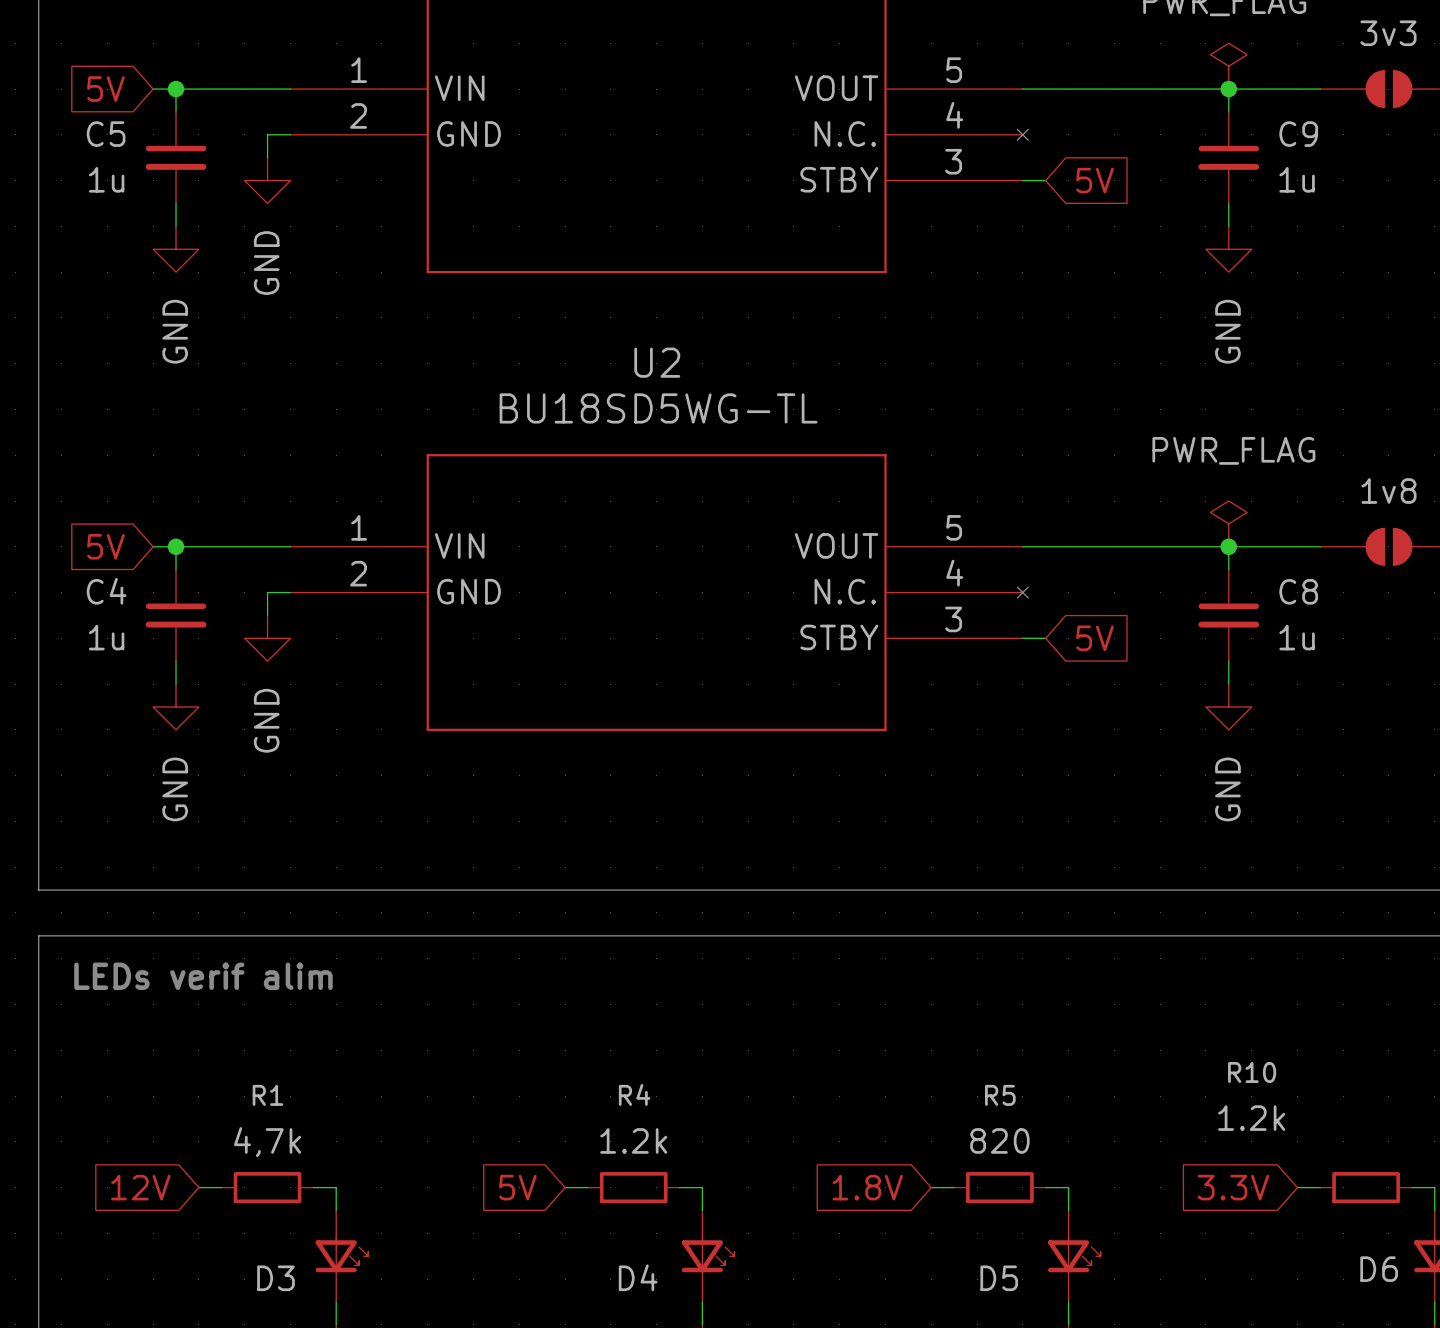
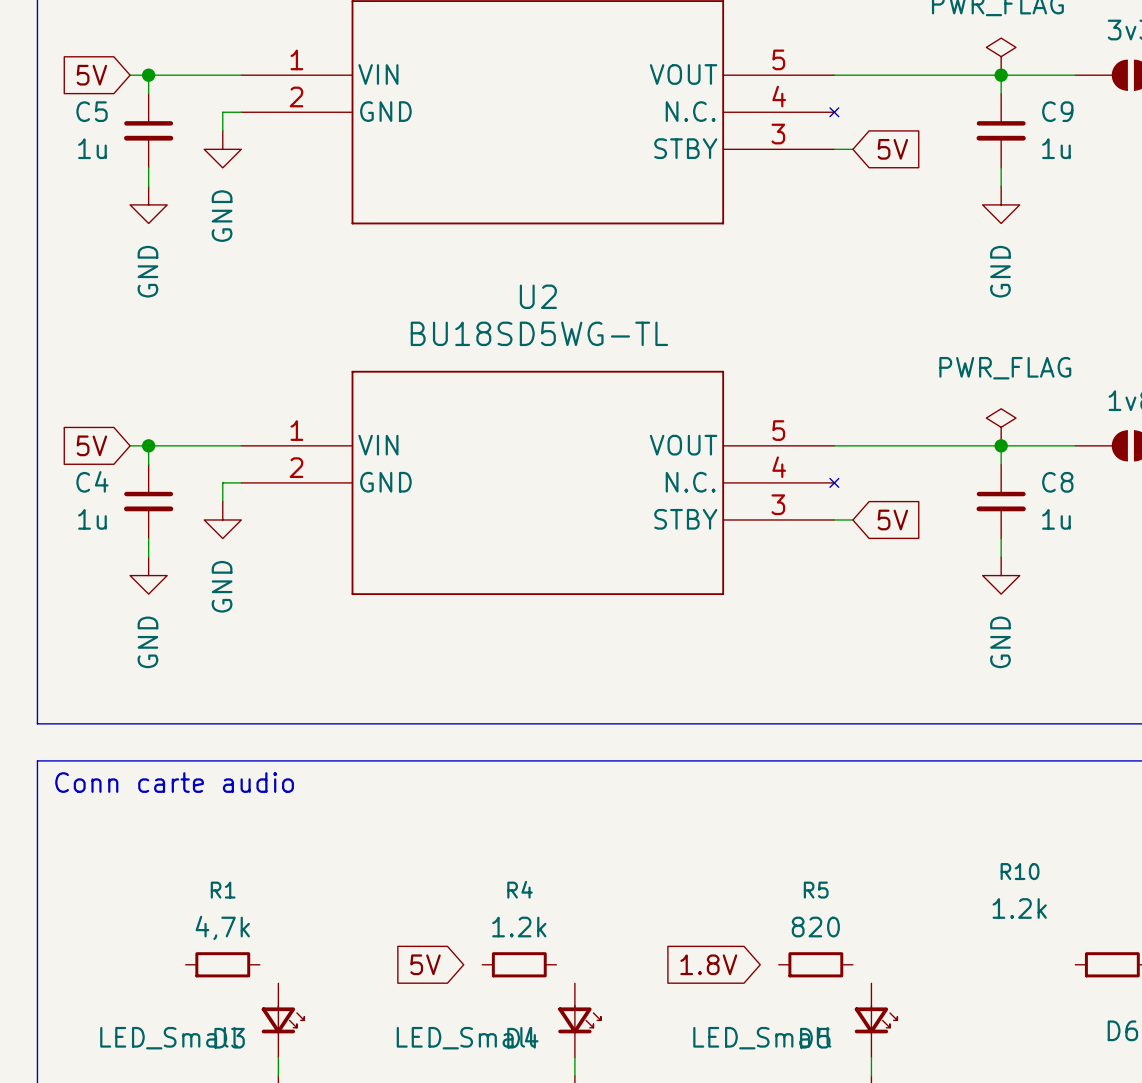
text: LEDs verif alim (203, 976) -> Conn carte audio (174, 782)
global label: 12V (140, 1187) -> none
wire: (198, 1187) (221, 1187) -> none
wire: (313, 1187) (336, 1187) (336, 1210) -> none
wire: (565, 1187) (587, 1187) -> none
wire: (679, 1187) (702, 1187) (702, 1210) -> none
wire: (931, 1187) (954, 1187) -> none
wire: (1045, 1187) (1068, 1187) (1068, 1210) -> none
global label: 3.3V (1233, 1187) -> none
wire: (1297, 1187) (1320, 1187) -> none
D3 value: none -> LED_Small (169, 1038)
D4 value: none -> LED_Small (465, 1038)
D5 value: none -> LED_Small (762, 1038)

